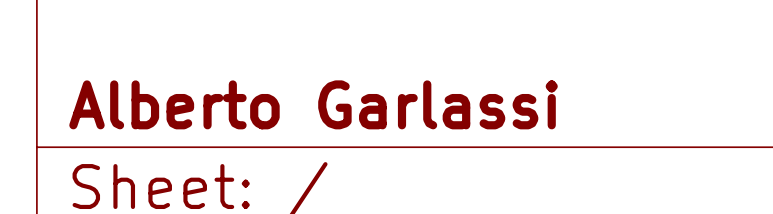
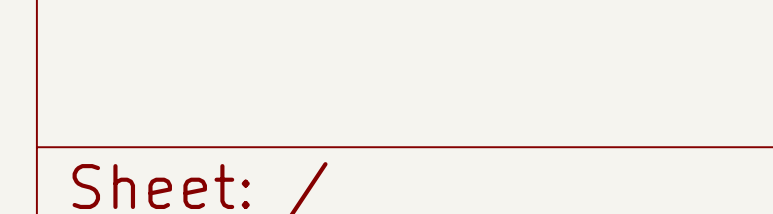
title block: Alberto Garlassi (313, 104) -> none

